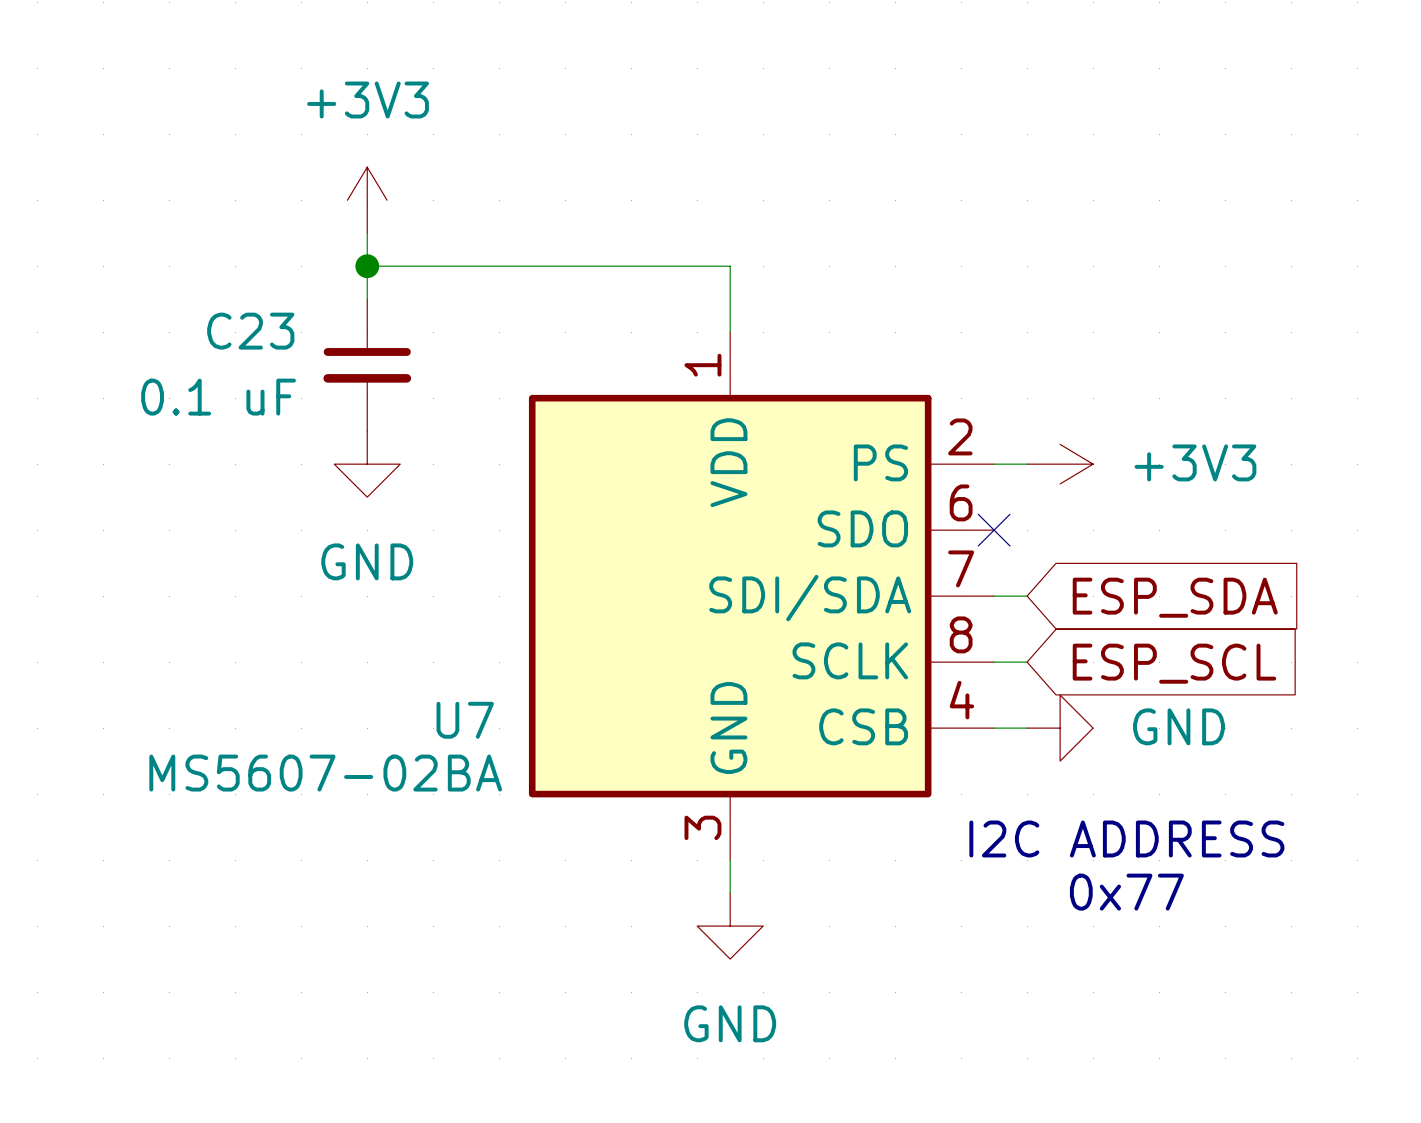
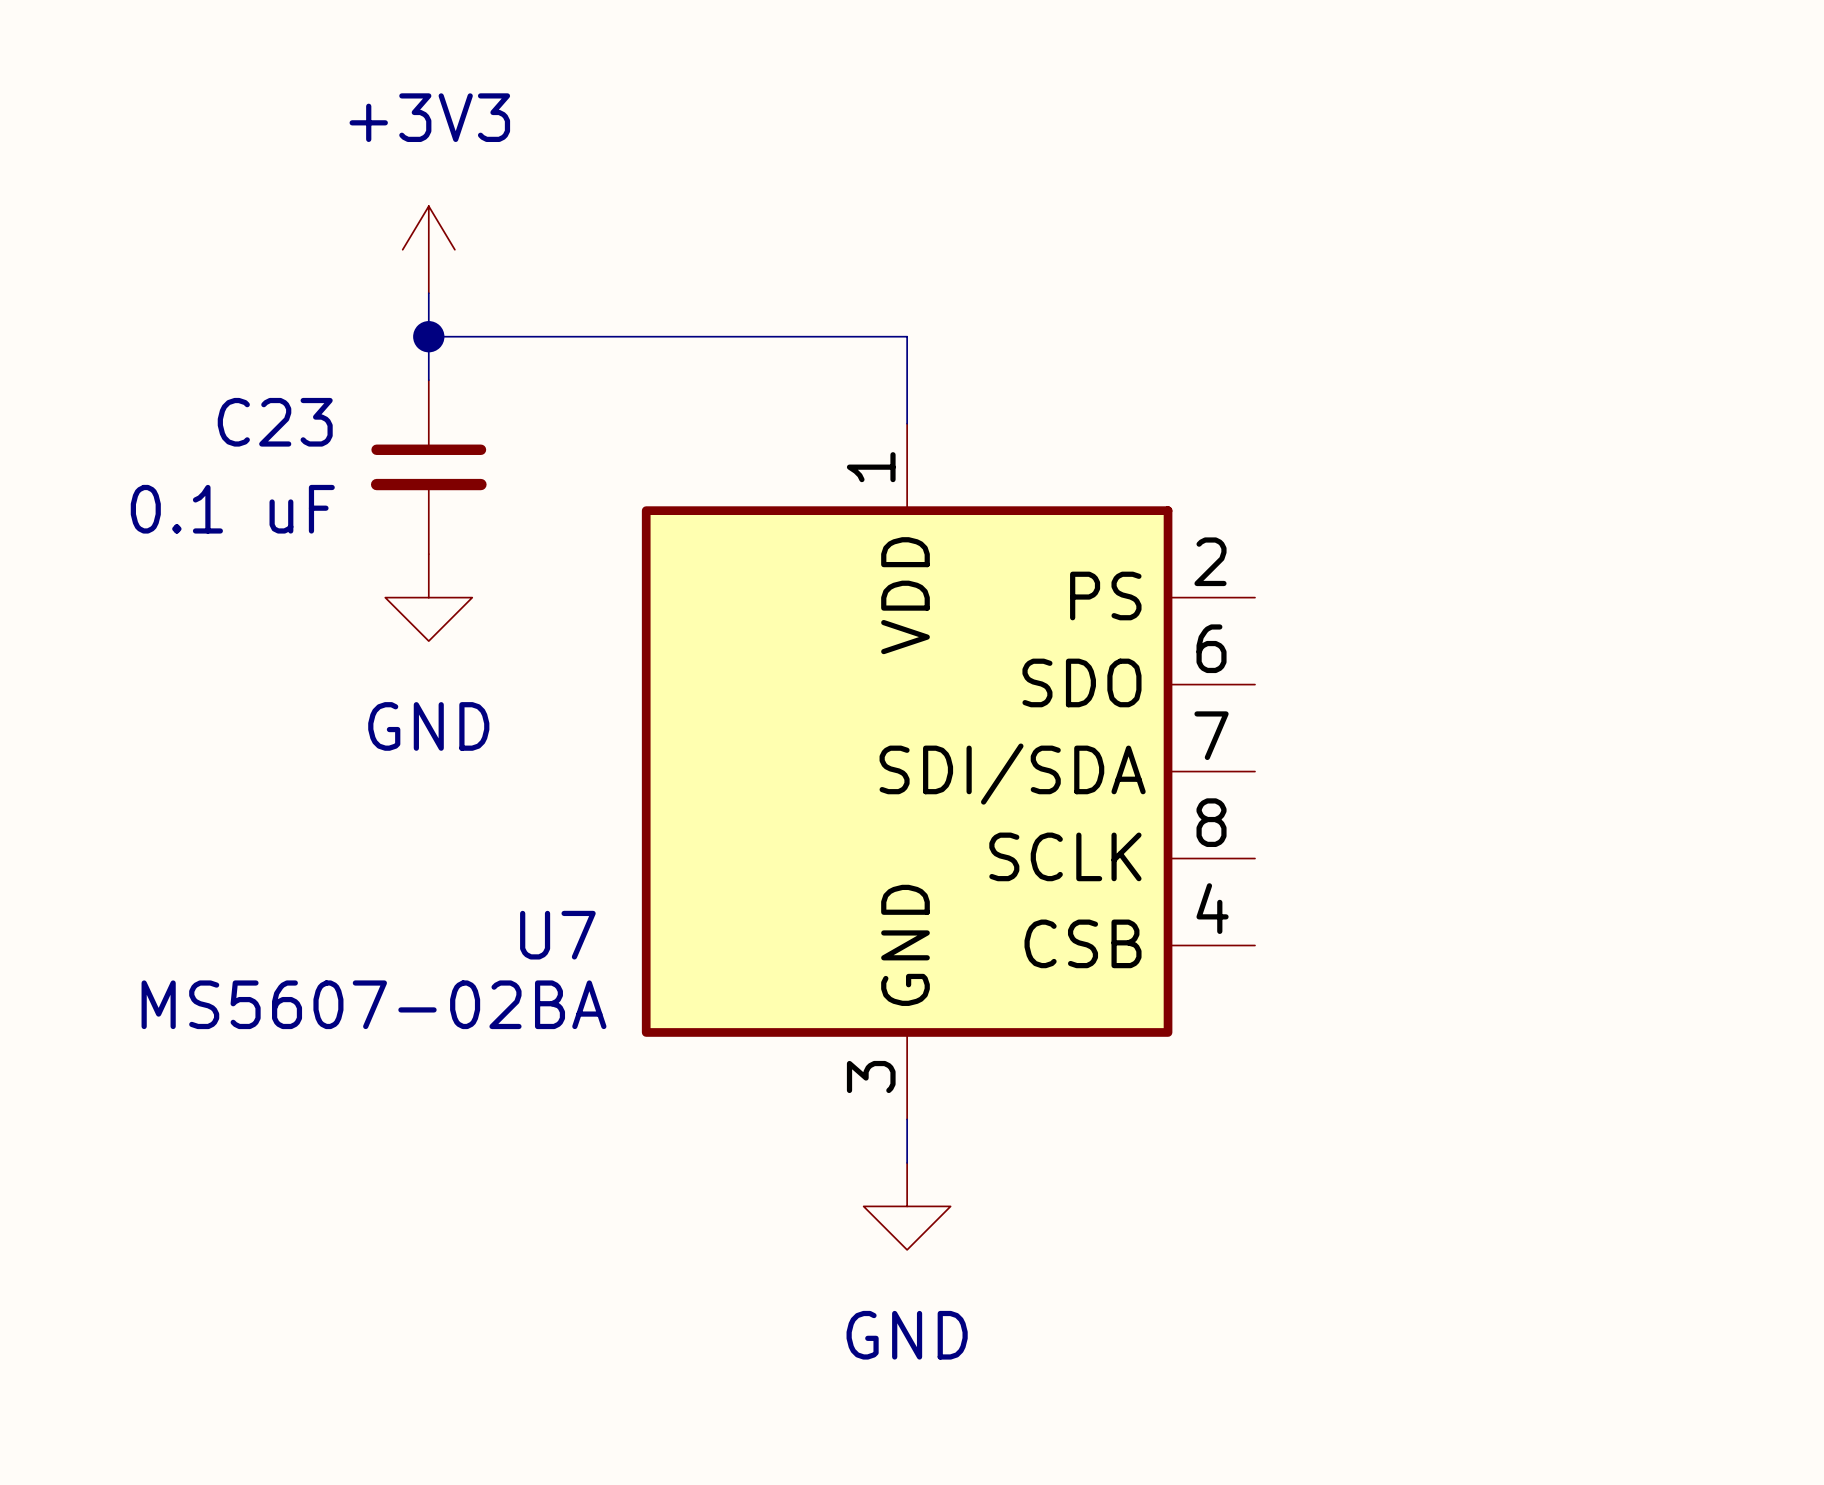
wire: (994, 464) (1027, 464) -> none
power symbol: +3V3 (1060, 464) -> none
no-connect mark: (994, 530) -> none
wire: (994, 596) (1027, 596) -> none
global label: ESP_SDA (1175, 597) -> none
wire: (994, 662) (1027, 662) -> none
global label: ESP_SCL (1174, 663) -> none
wire: (994, 728) (1027, 728) -> none
power symbol: GND (1060, 728) -> none
text: I2C ADDRESS (1126, 838) -> none
text: 0x77 (1126, 892) -> none

